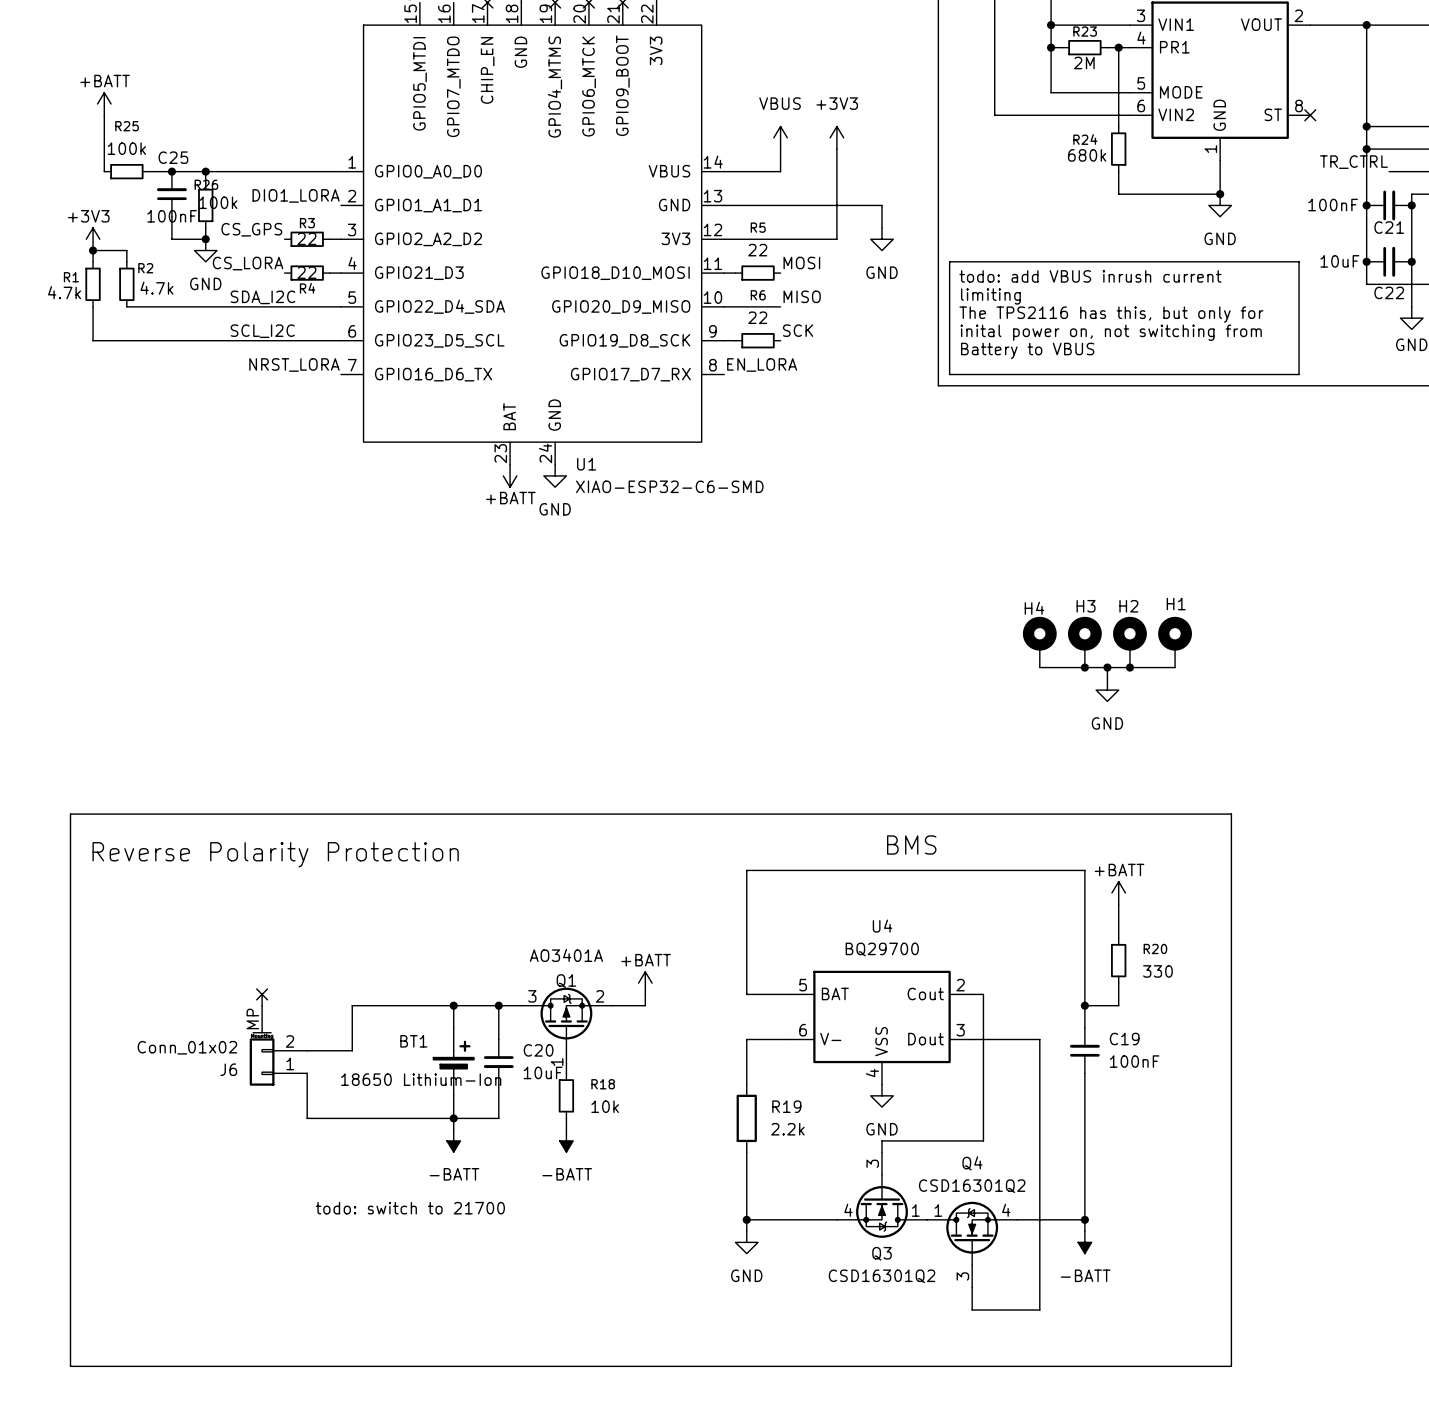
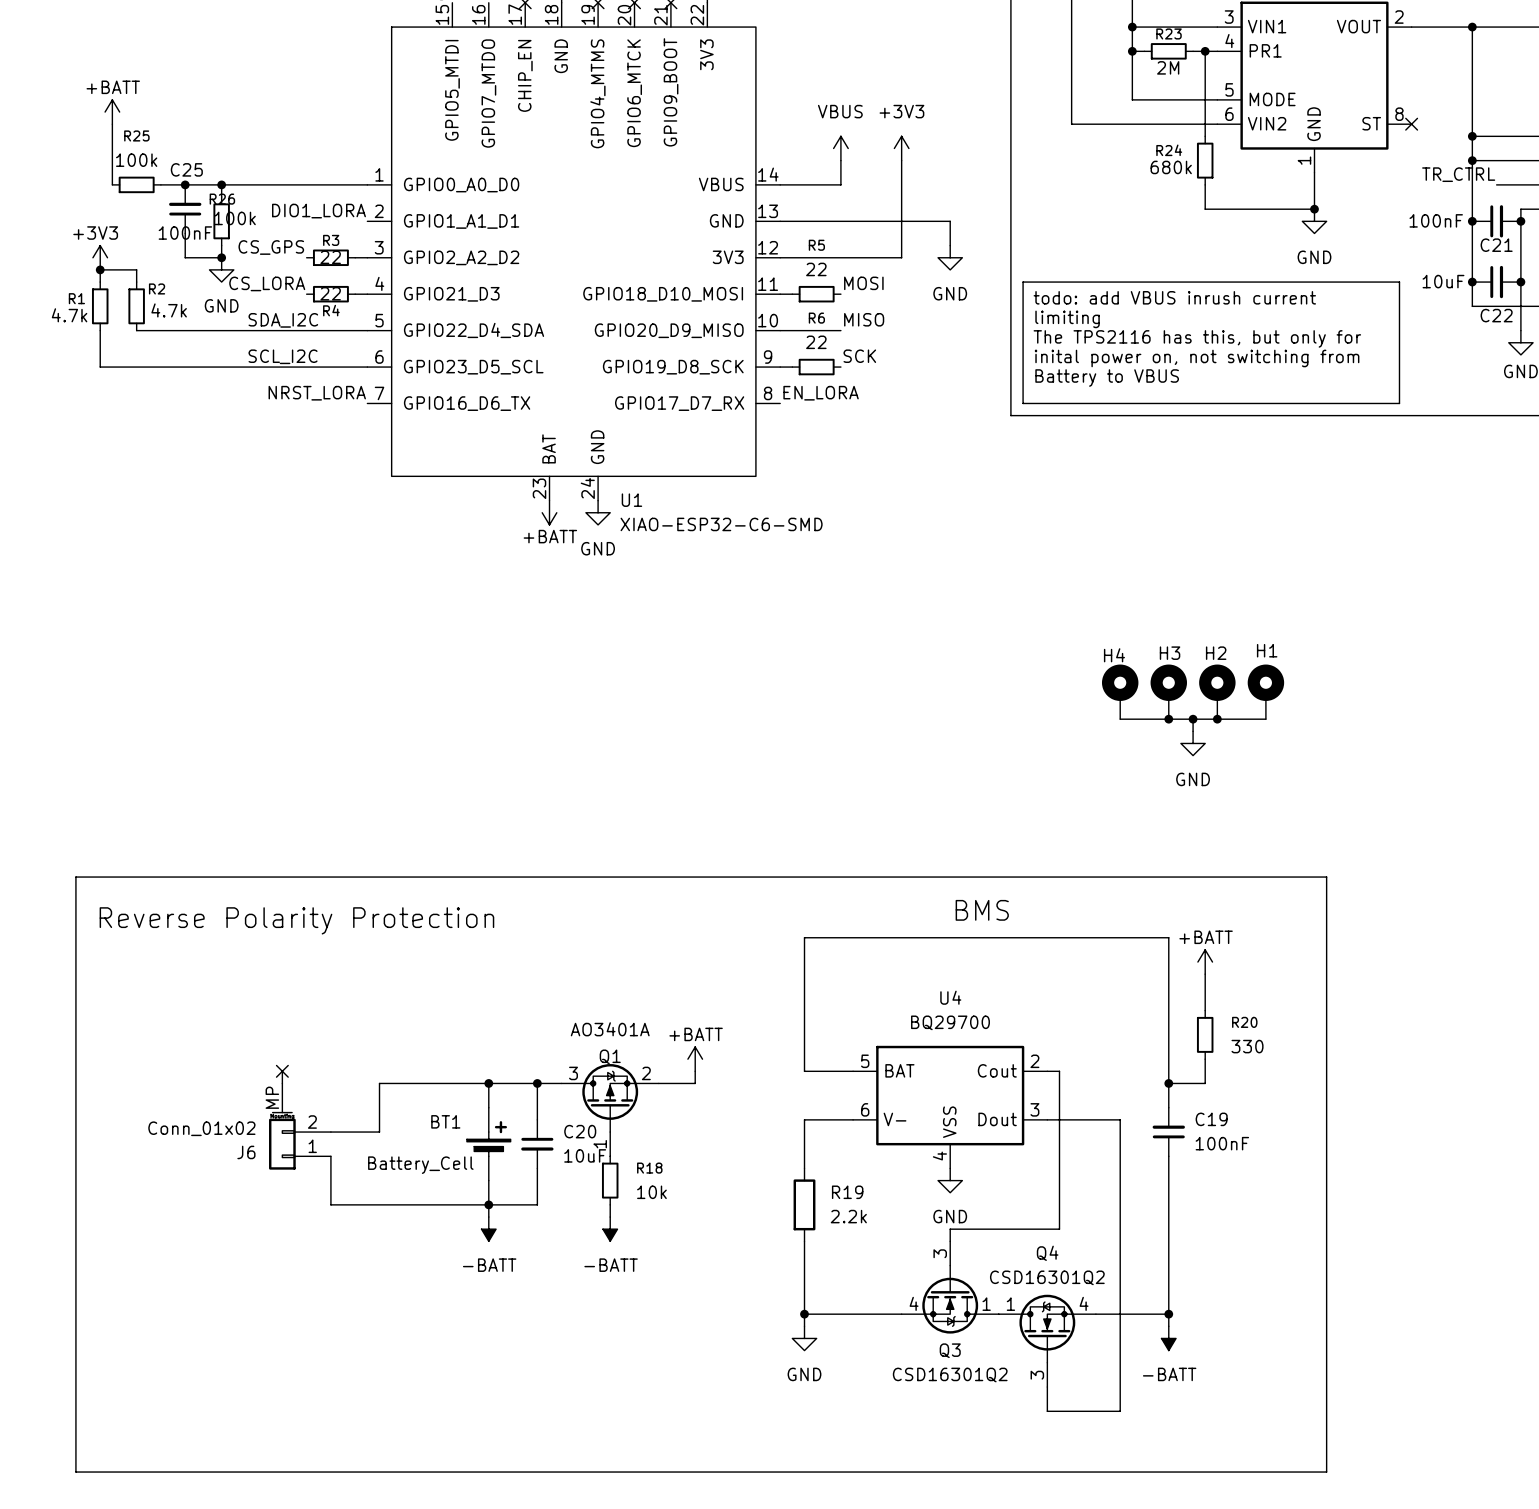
BT1 value: 18650 Lithium-Ion (421, 1079) -> Battery_Cell (420, 1165)
text: todo: switch to 21700 (410, 1208) -> none

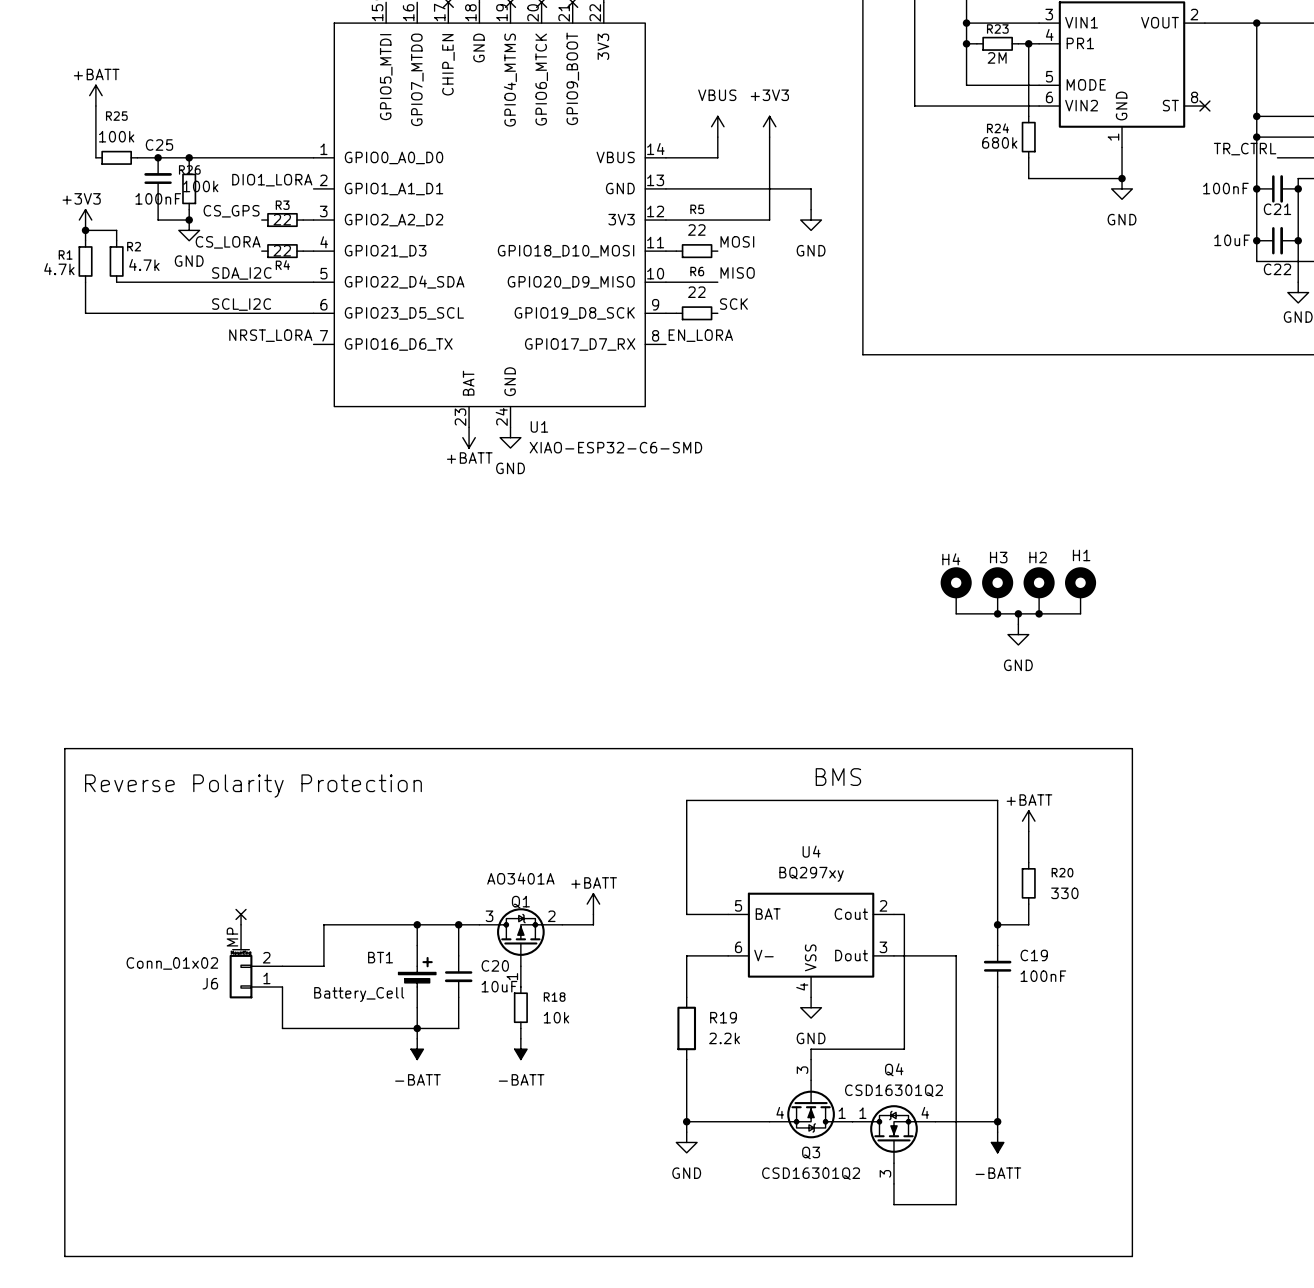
line: (1023, 282) (1399, 282) (1399, 403) (1023, 403) (1023, 282) -> none
text: todo: add VBUS inrush current (1174, 297) -> none
text: limiting (1067, 319) -> none
text: The TPS2116 has this, but only for (1197, 338) -> none
text: inital power on, not switching from (1197, 358) -> none
text: Battery to VBUS (1107, 378) -> none
U4 value: BQ29700 (950, 1022) -> BQ297xy (811, 874)

